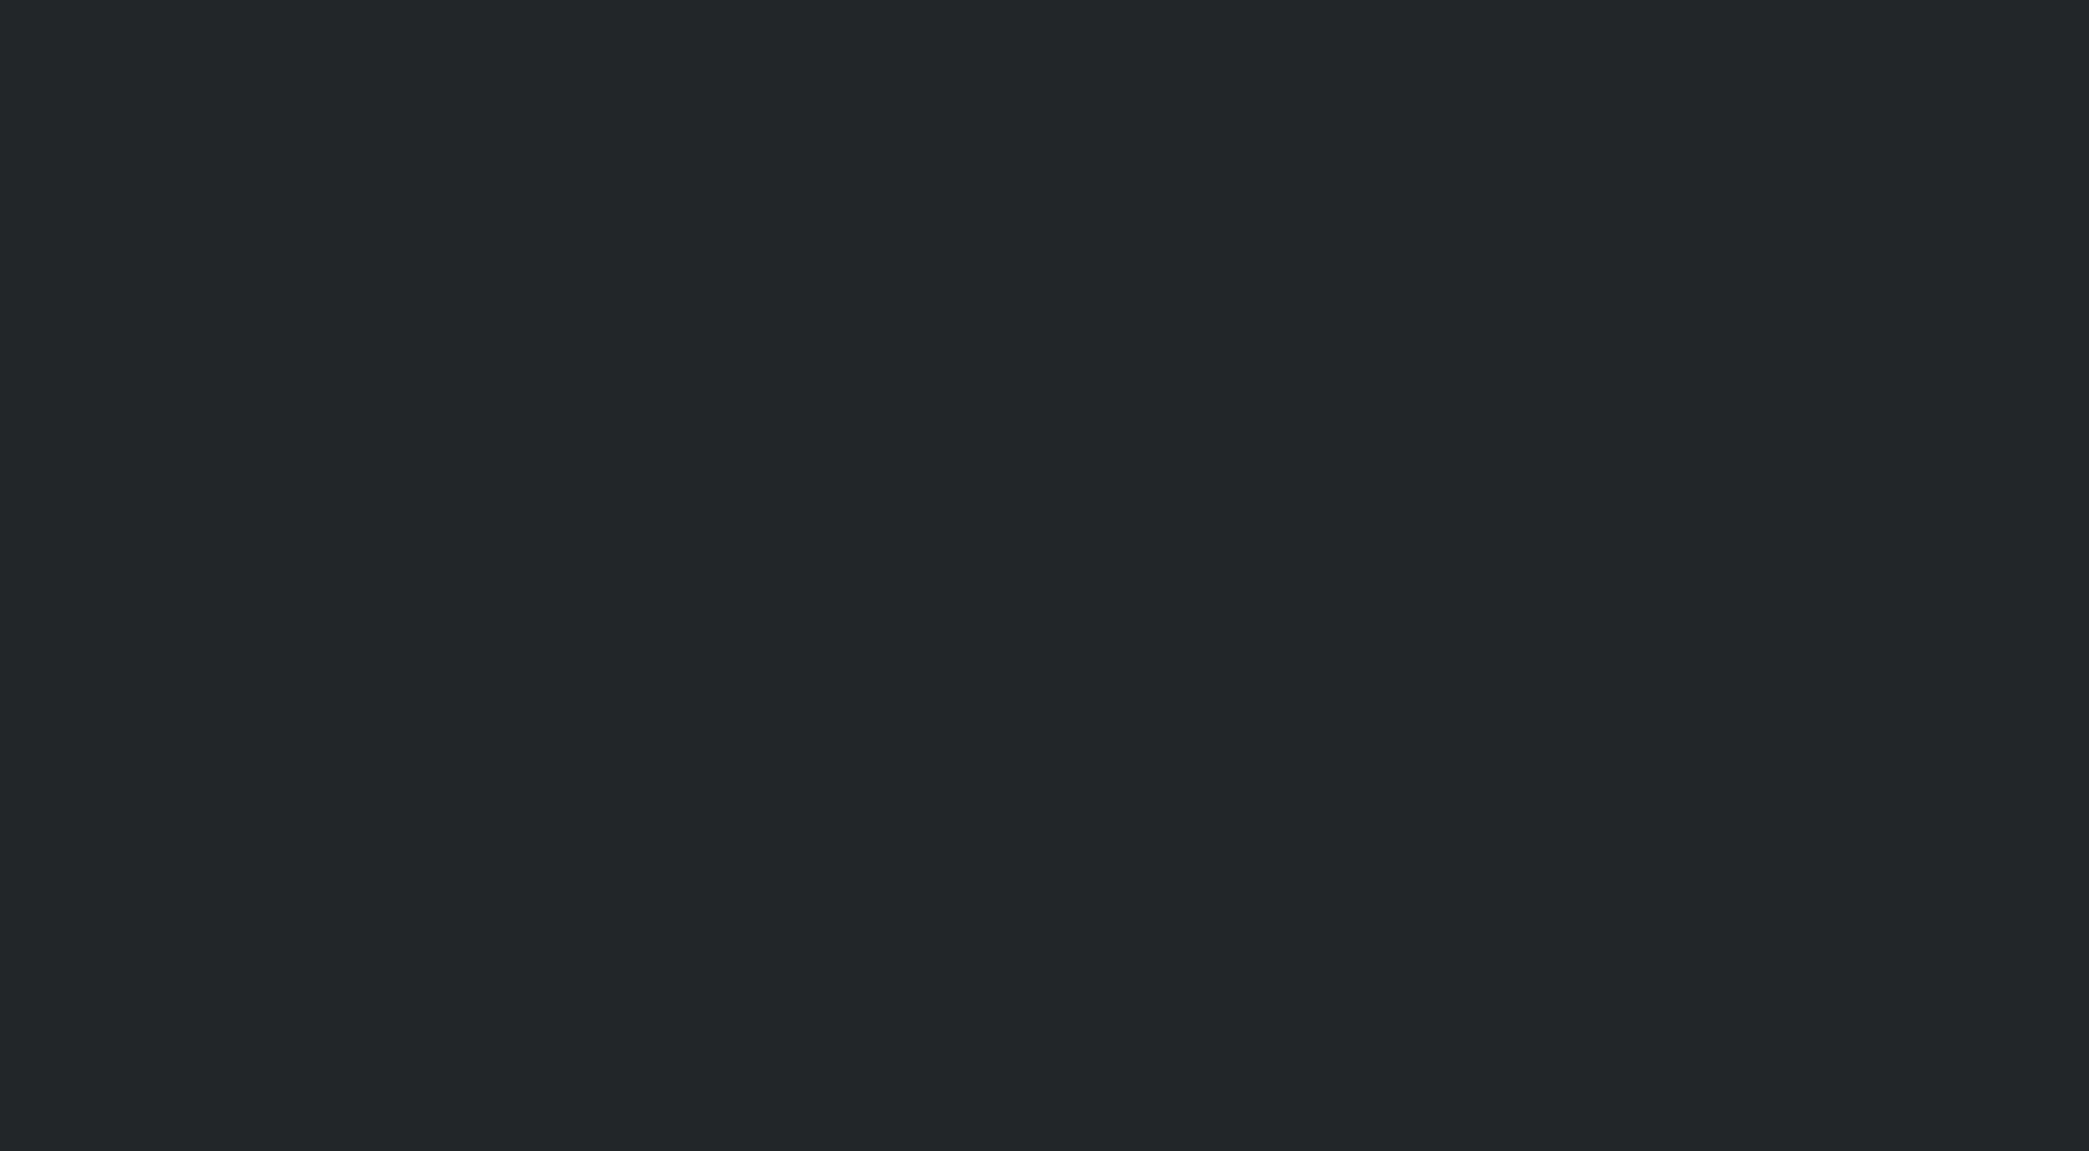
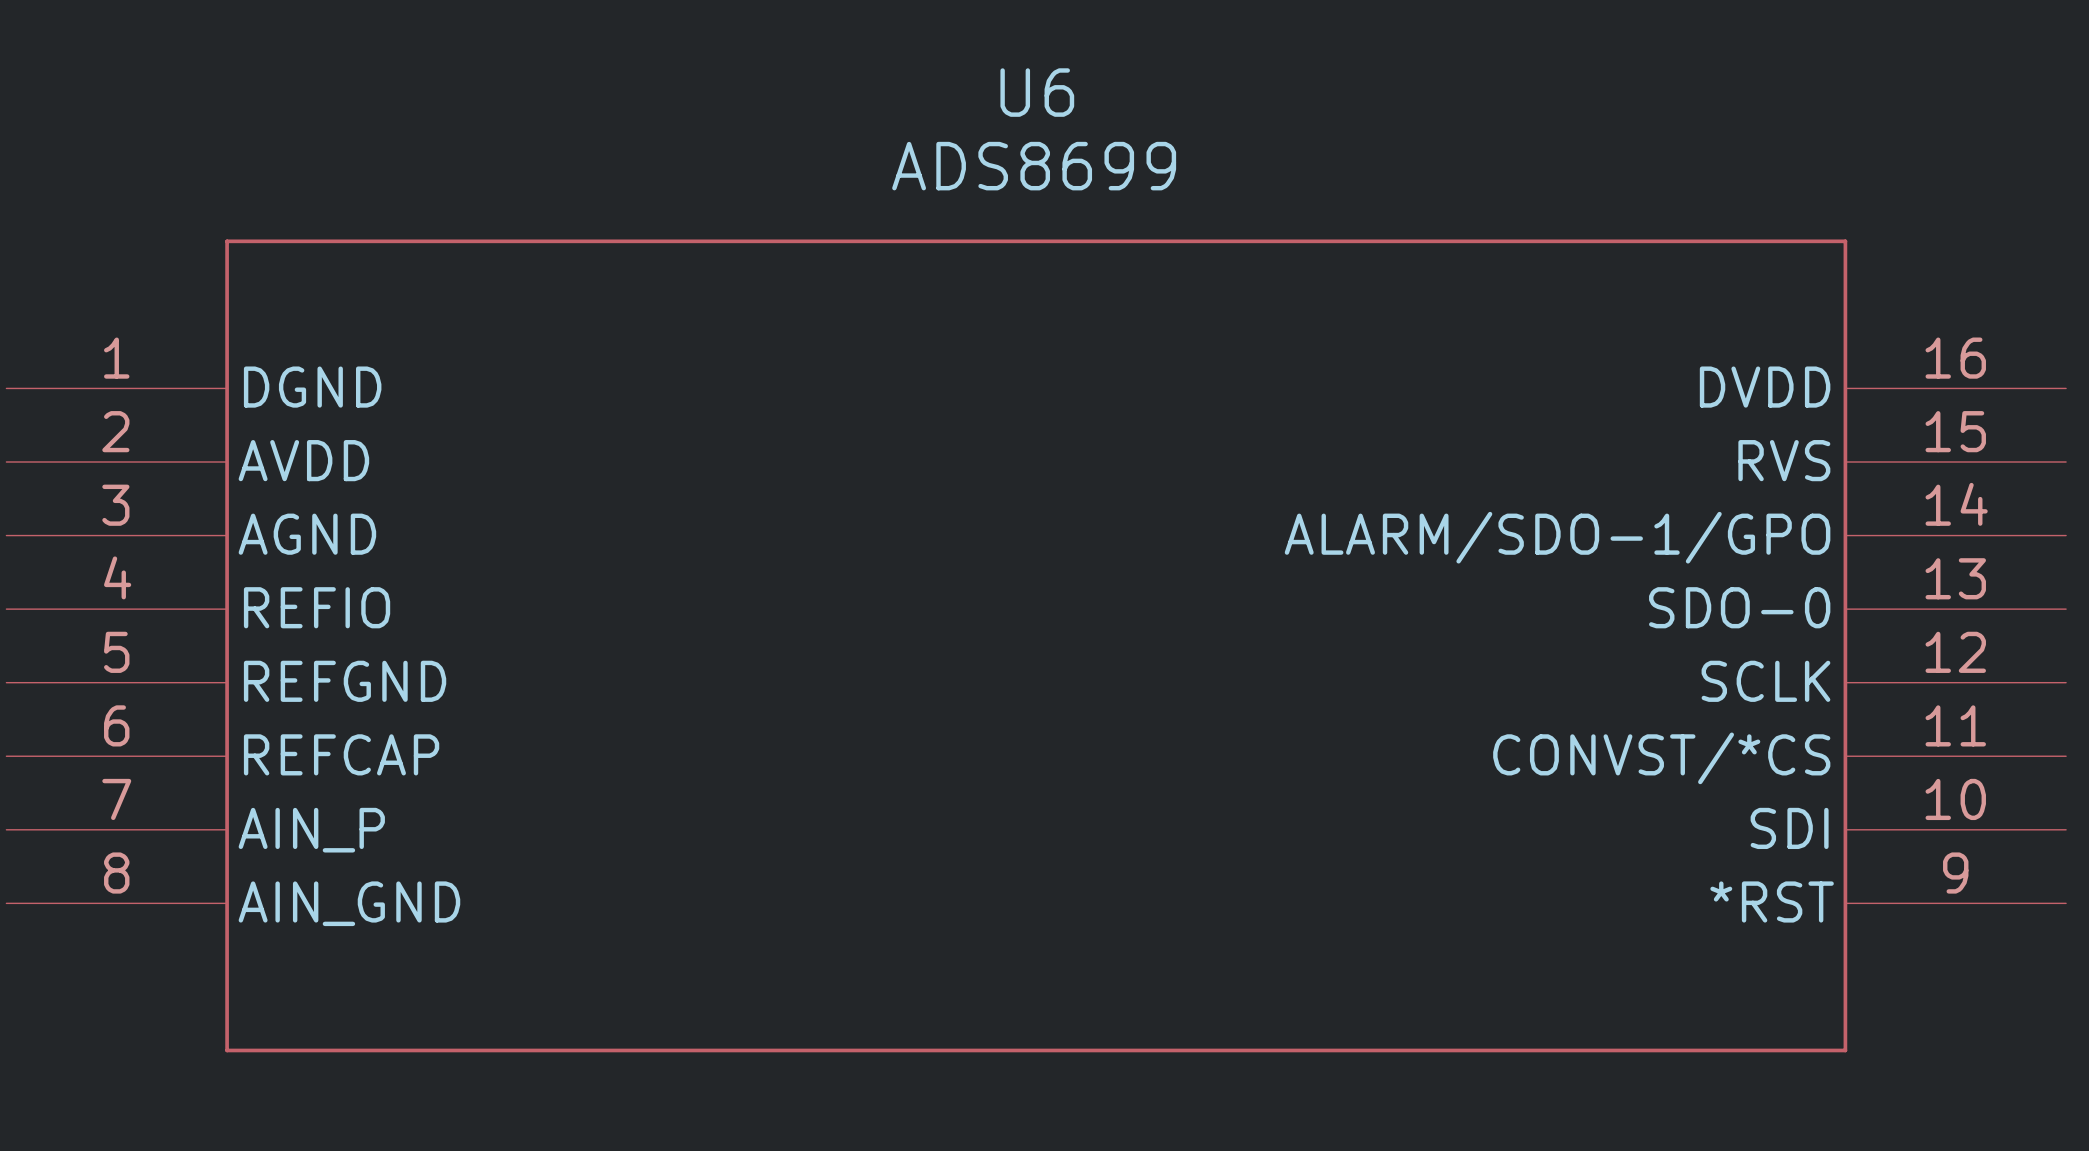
U6: none -> ADS8699 (1036, 645)

